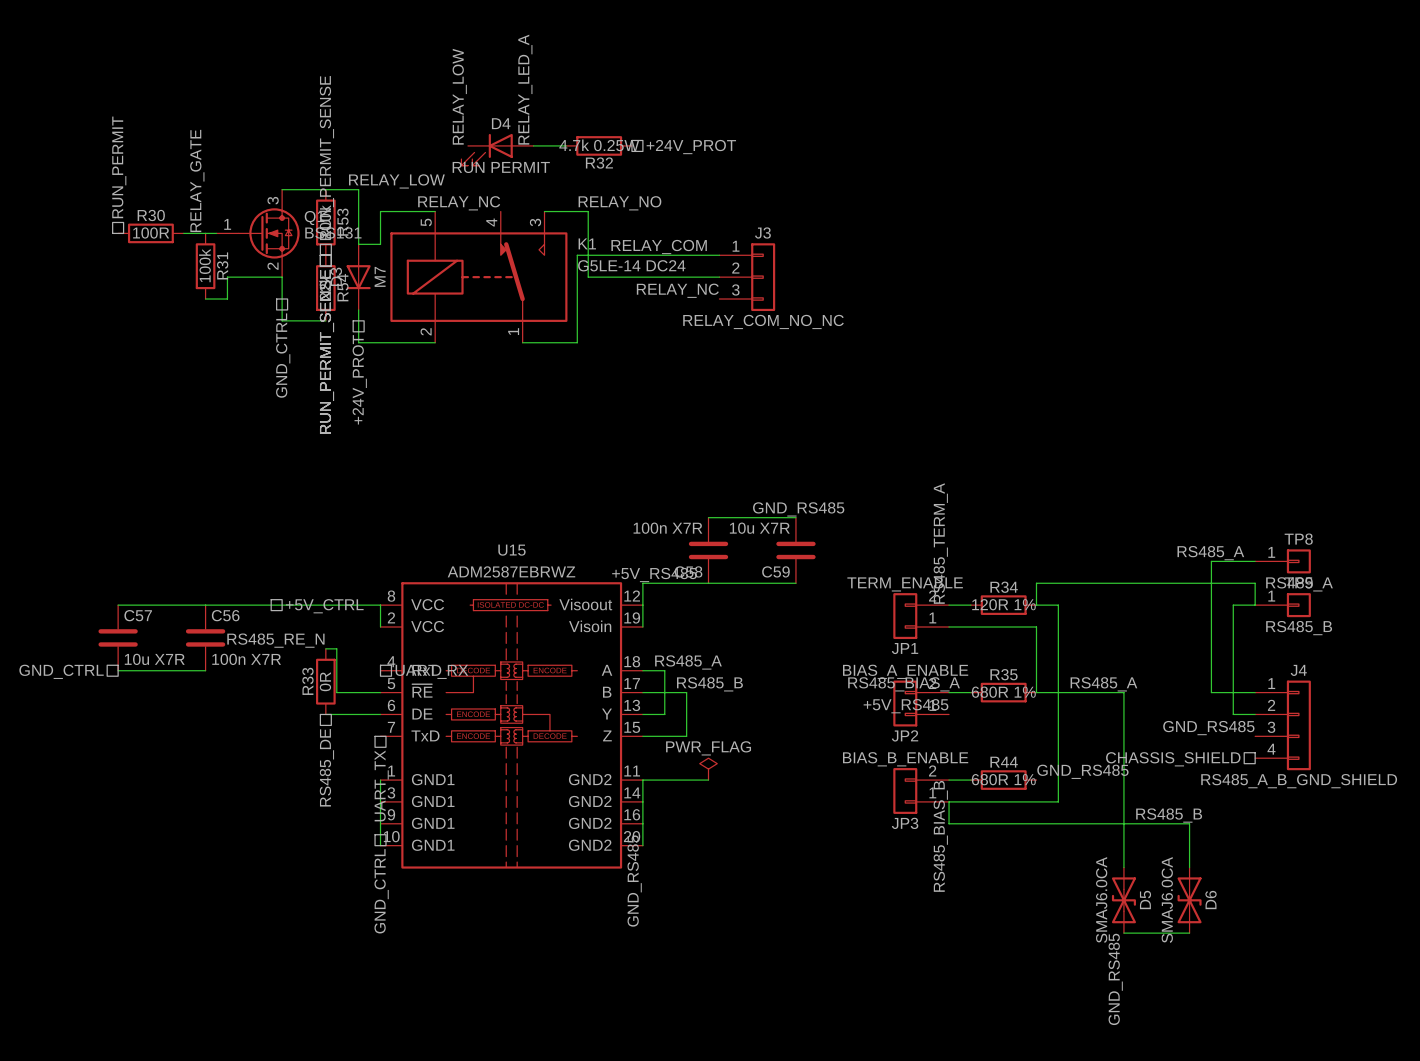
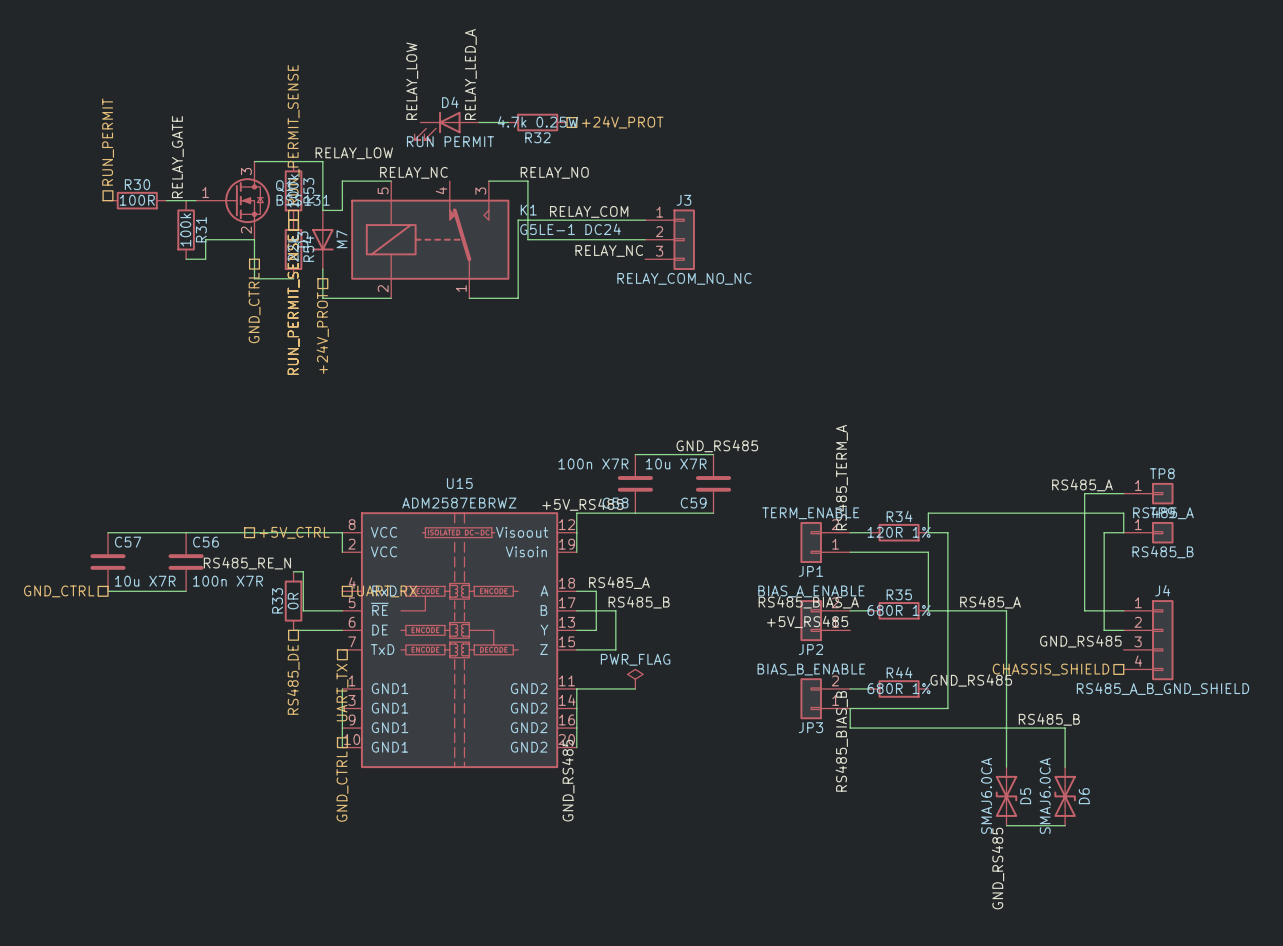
K1 value: G5LE-14 DC24 (631, 265) -> G5LE-1 DC24 (570, 229)

